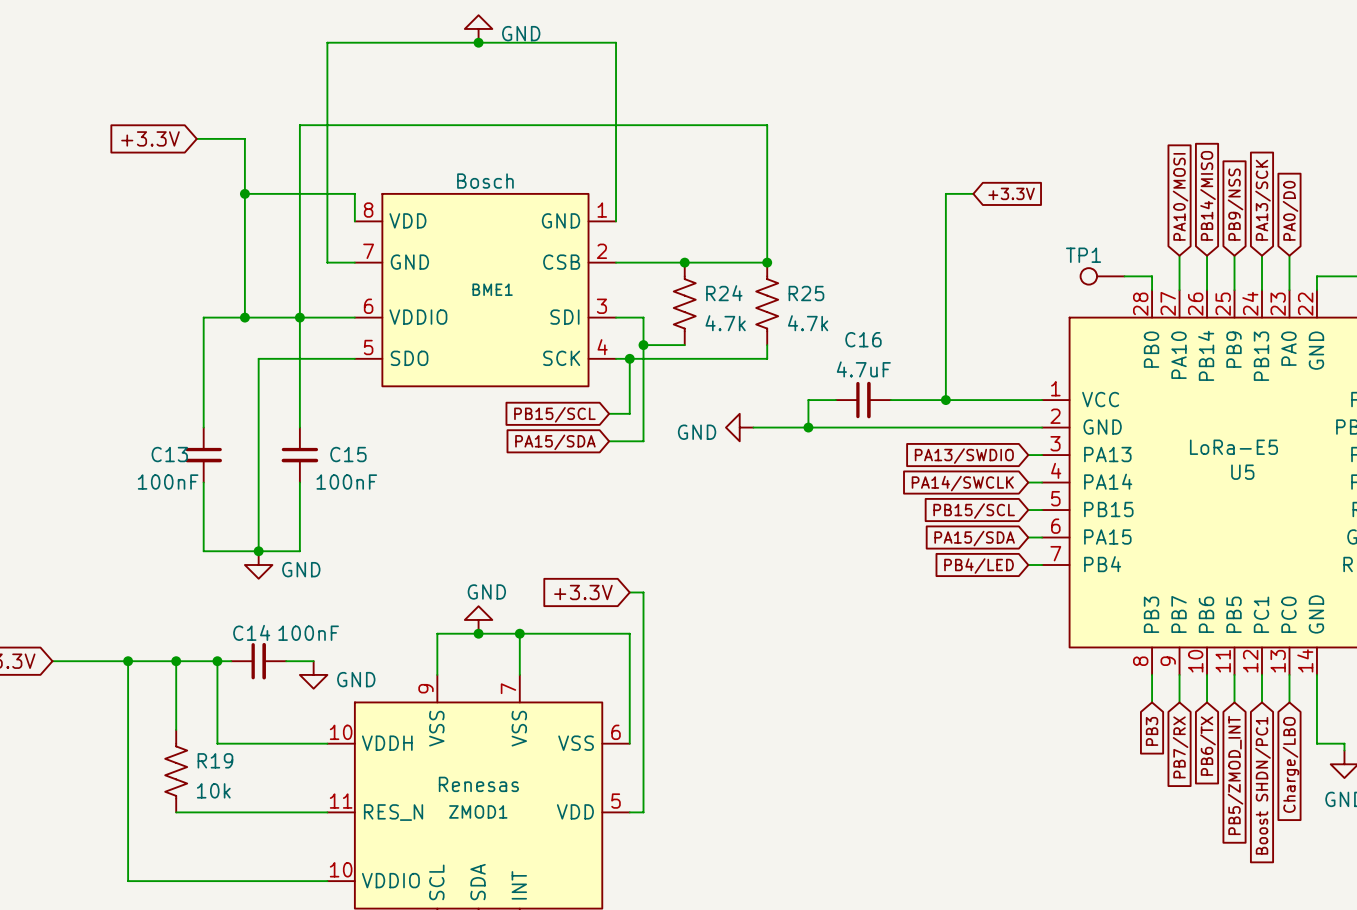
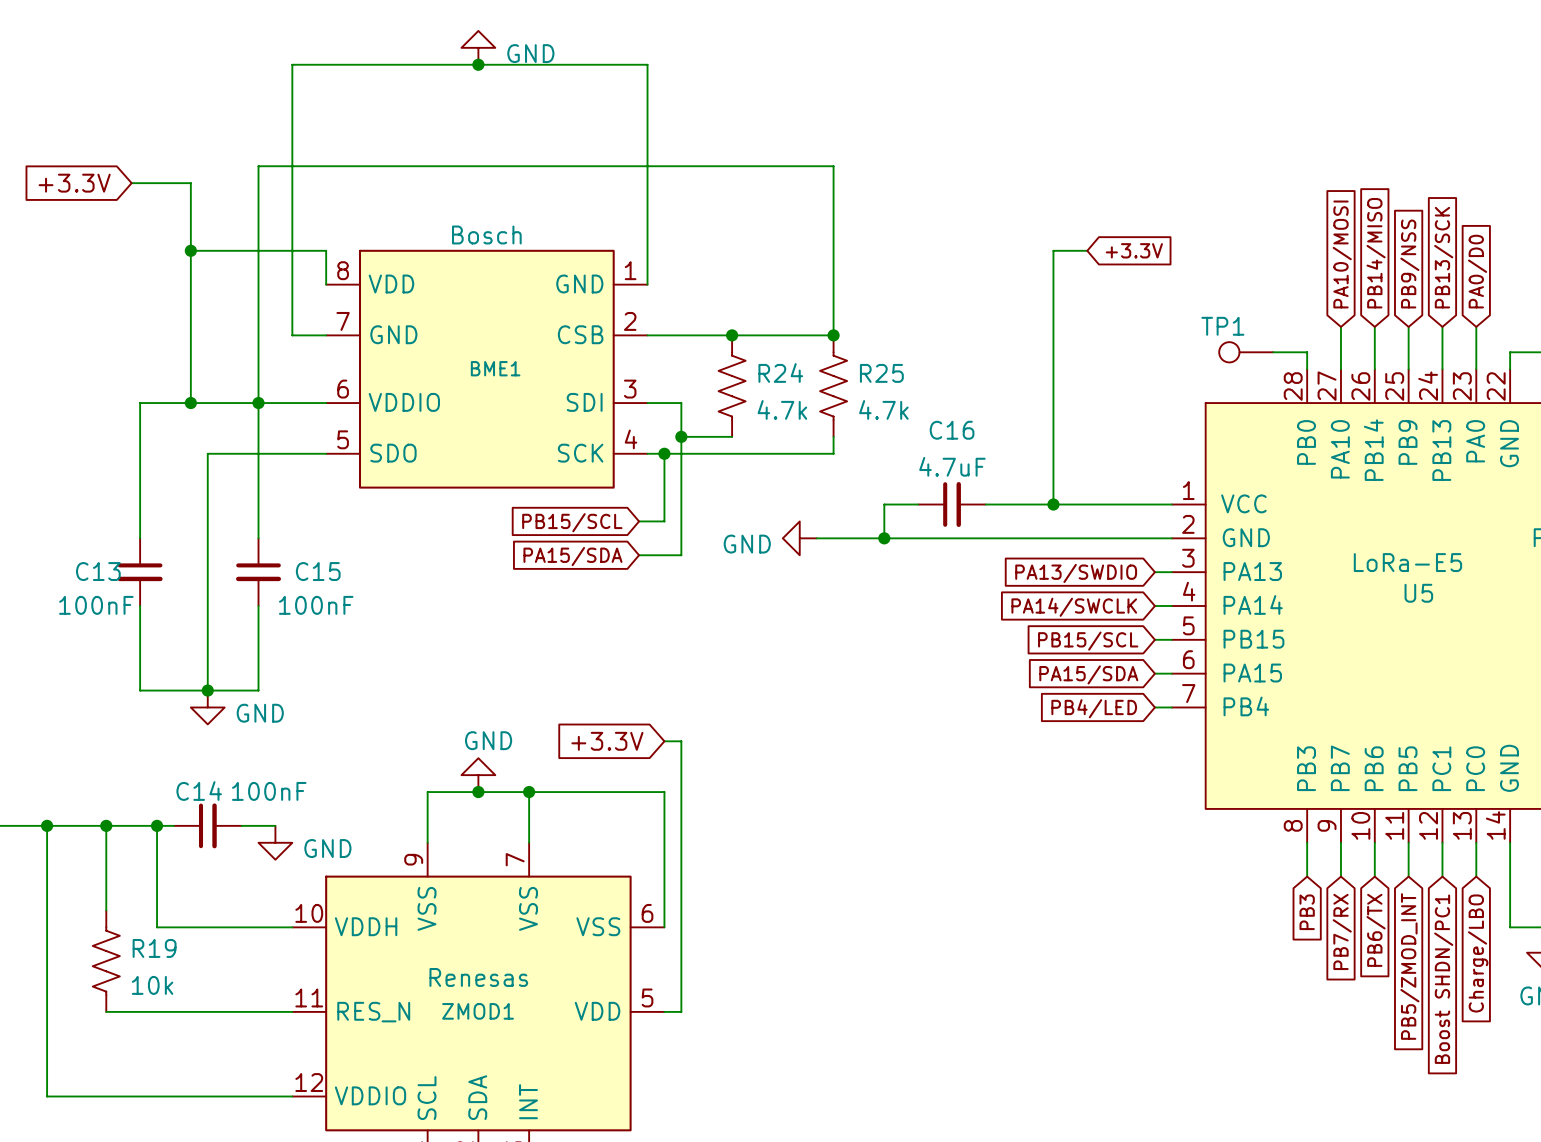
global label: PA13/SCK (1263, 200) -> PB13/SCK (1443, 257)
ZMOD1 pin number: 10 (341, 869) -> 12 (309, 1082)

